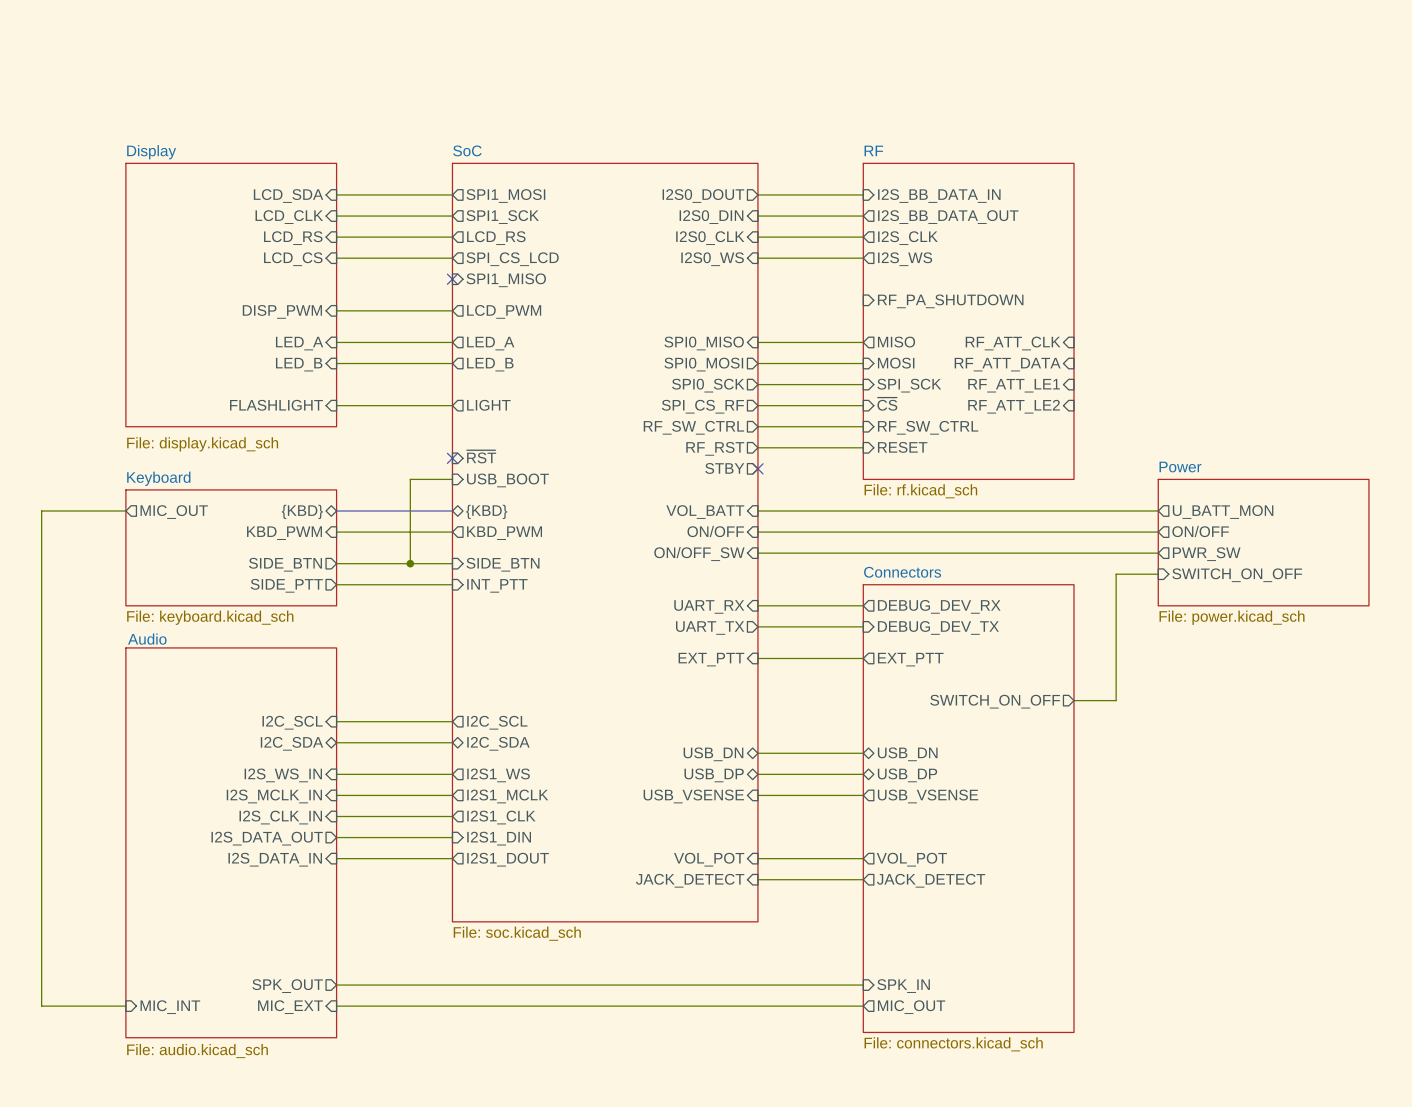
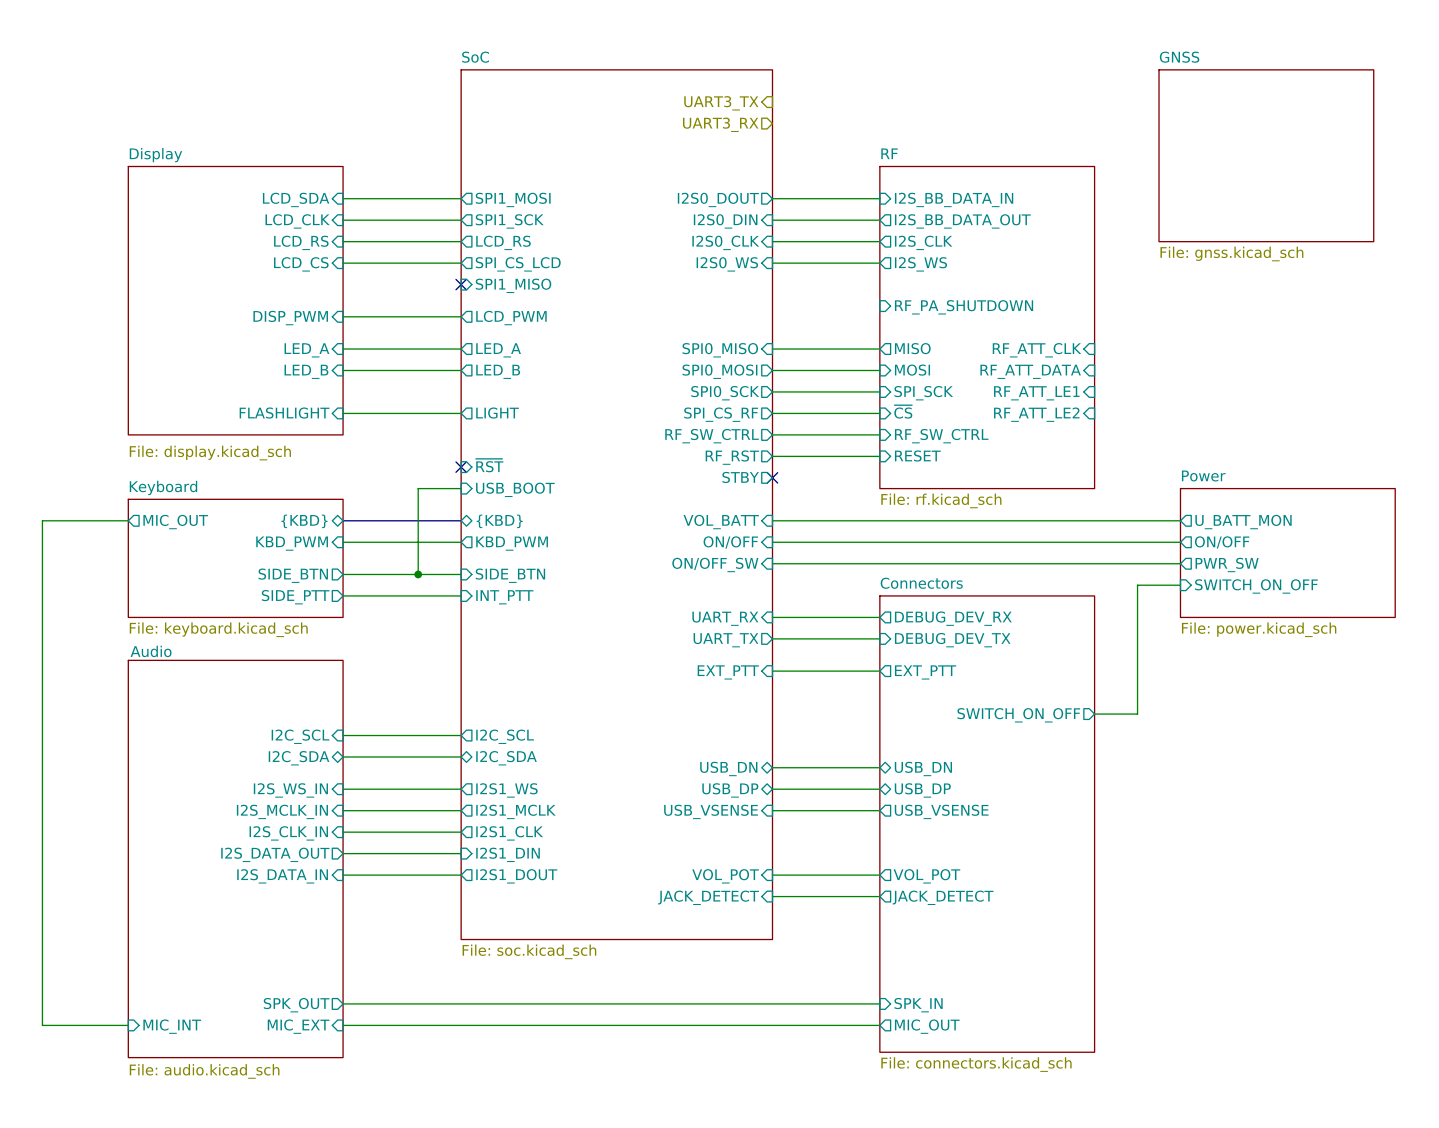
hierarchical label: none -> UART3_TX (721, 103)
hierarchical label: none -> UART3_RX (720, 124)
sheet GNSS: none -> File: gnss.kicad_sch (1266, 155)
sheet SoC: none -> File: soc.kicad_sch (616, 504)
sheet SoC: File: soc.kicad_sch (605, 542) -> none

